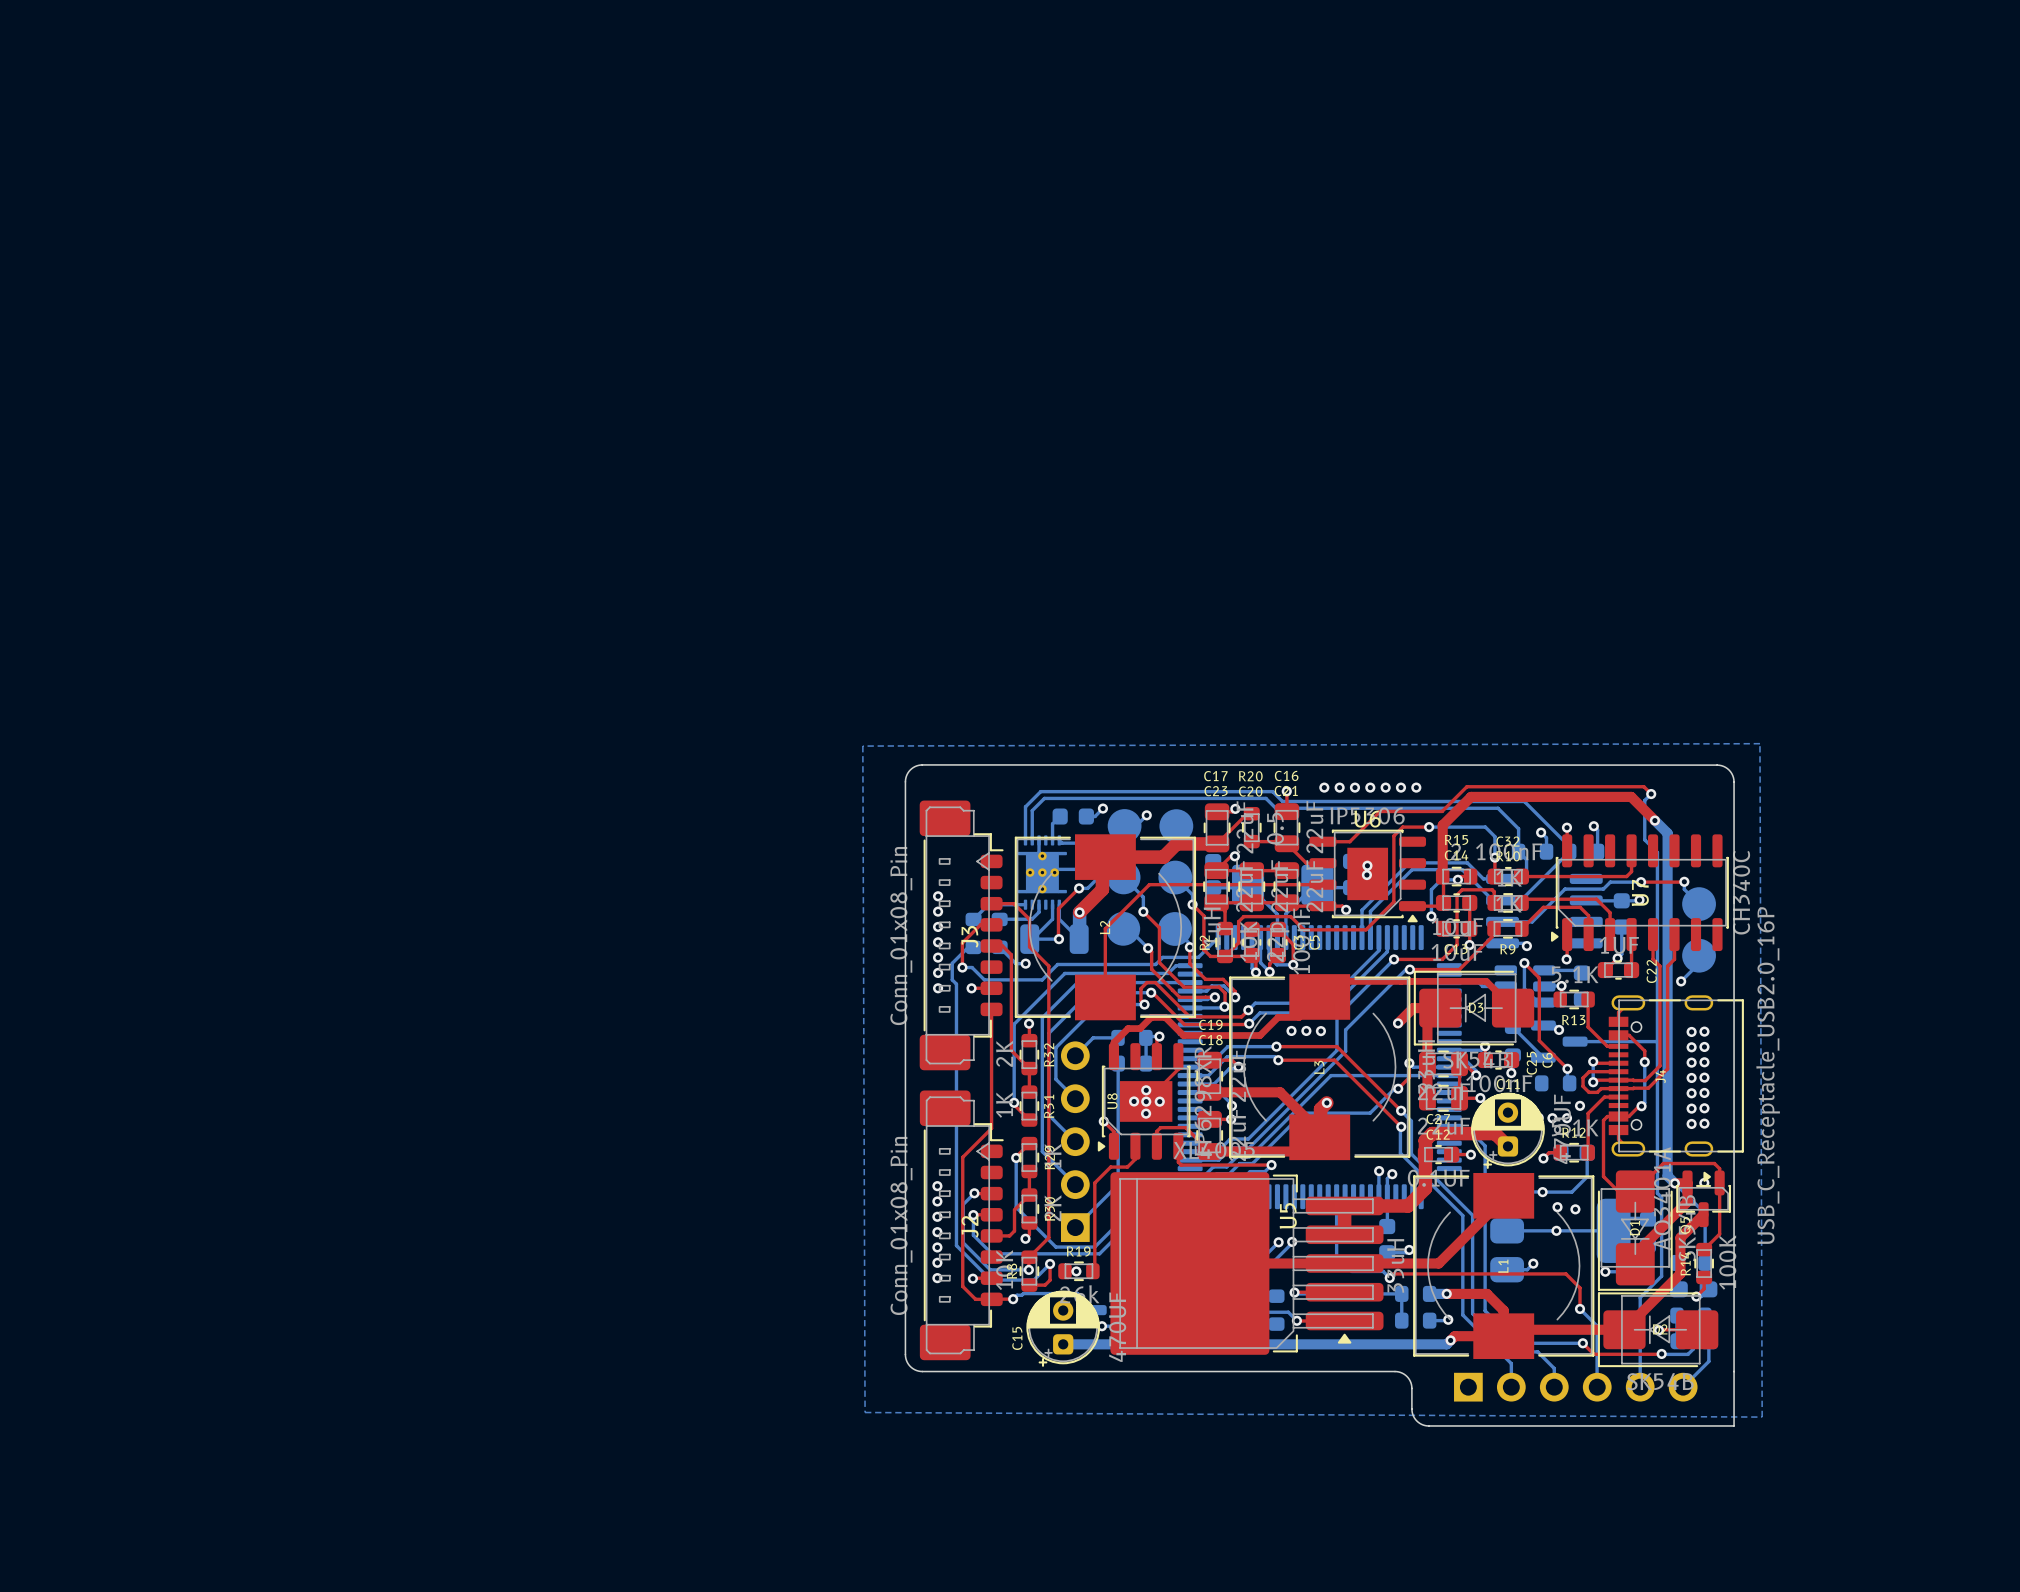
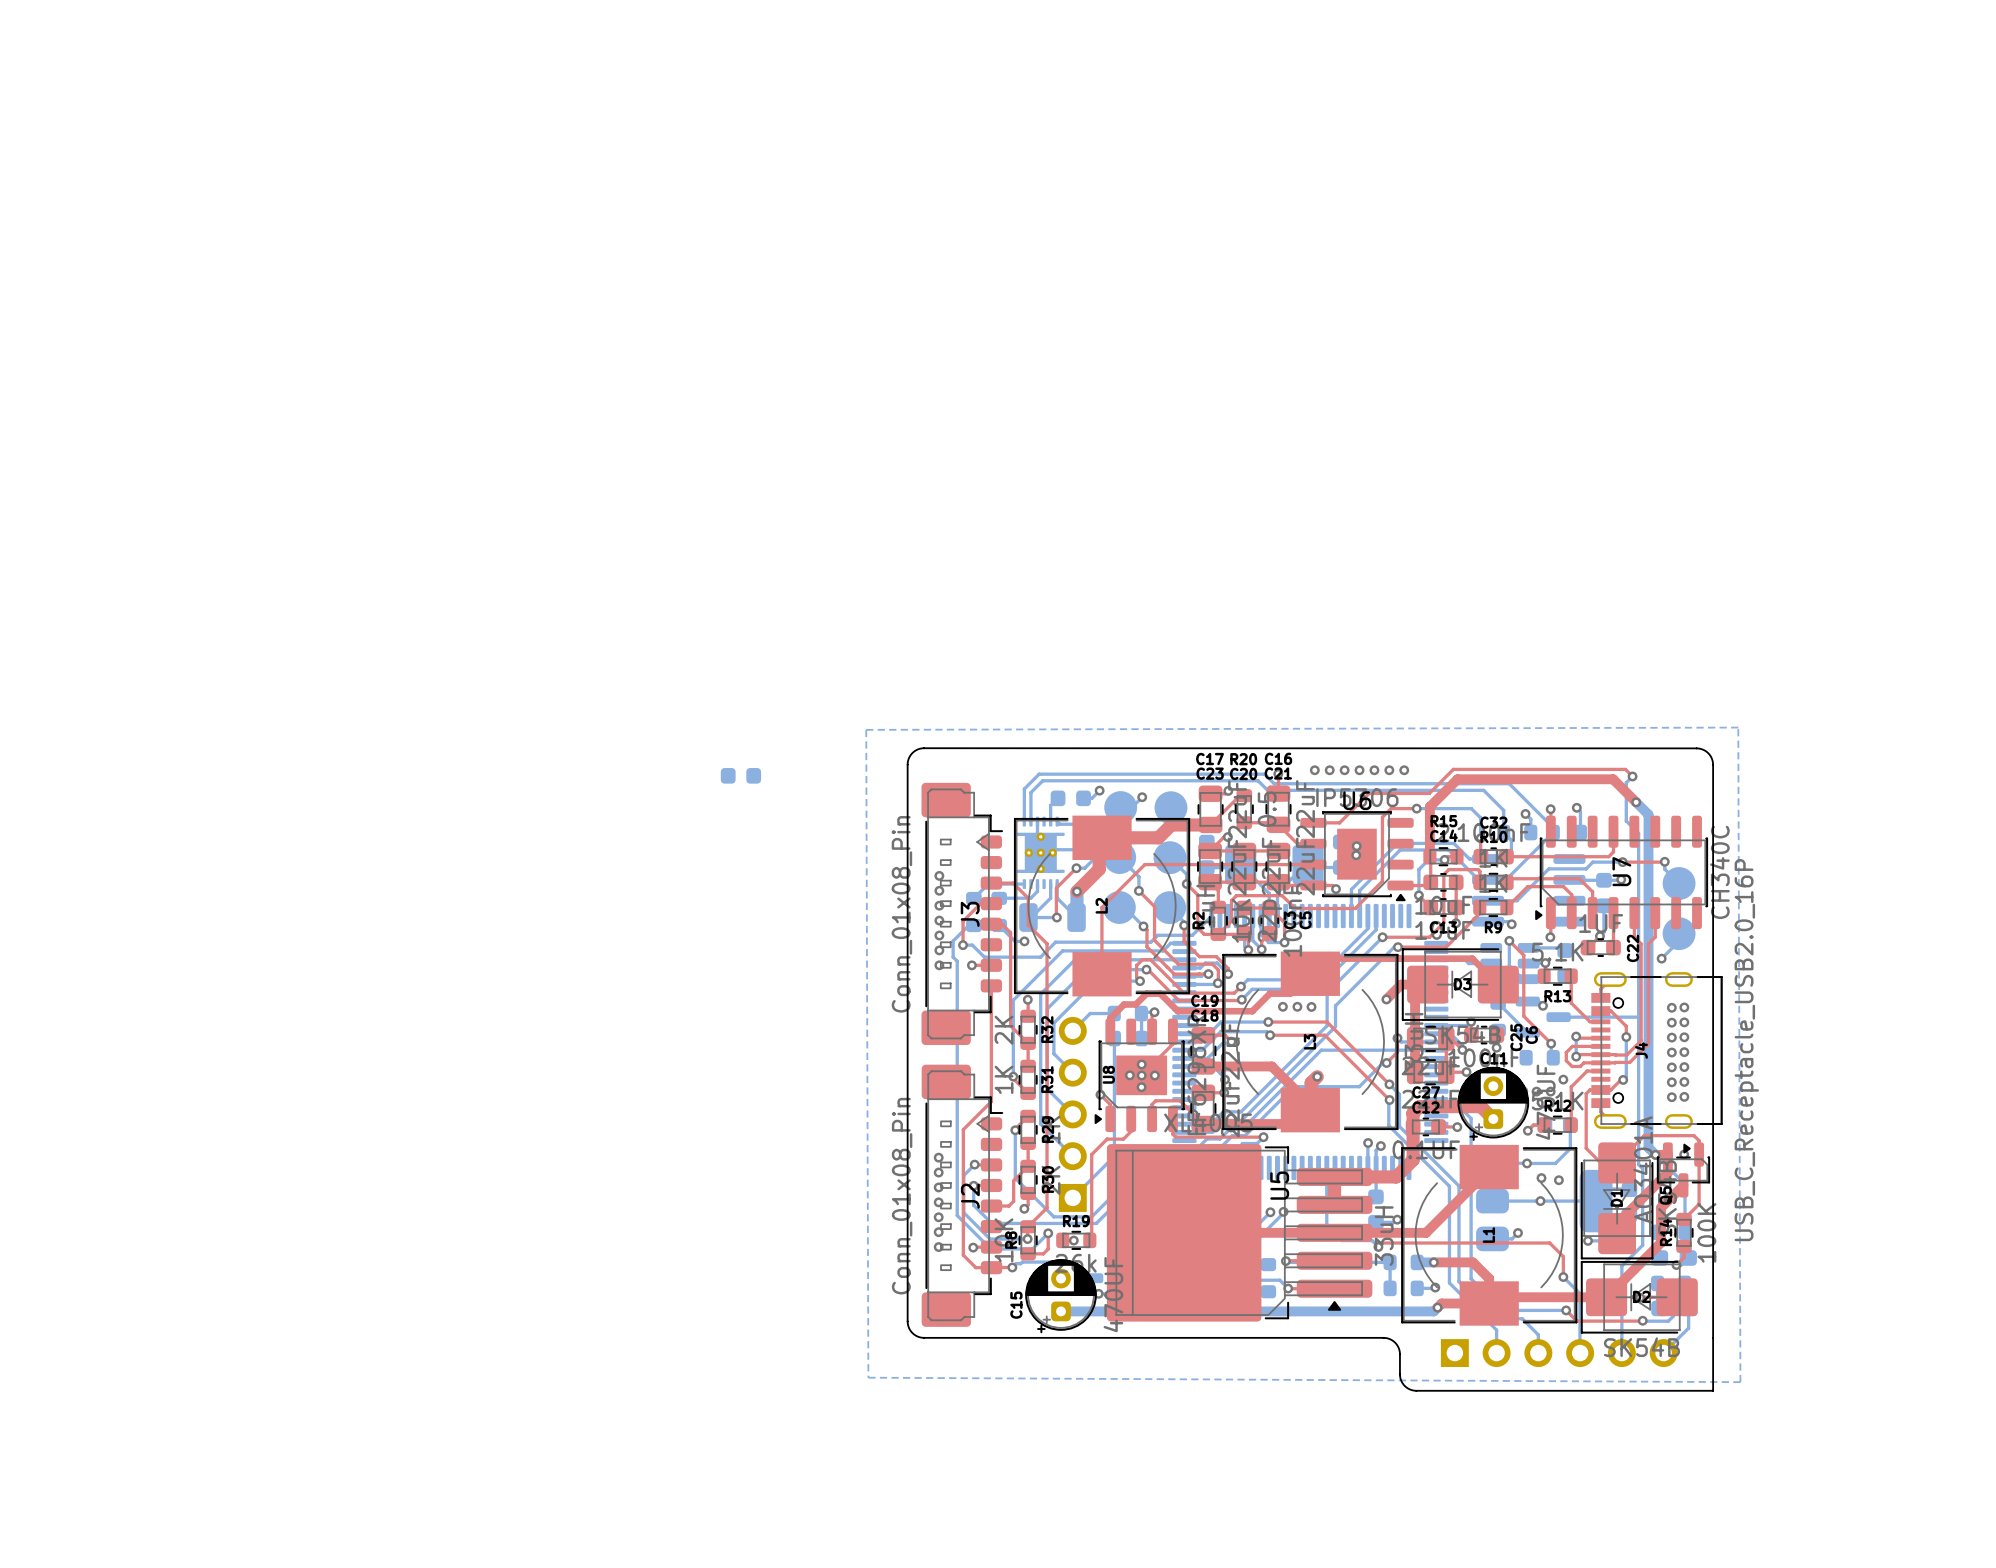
part: none -> (740, 775)

